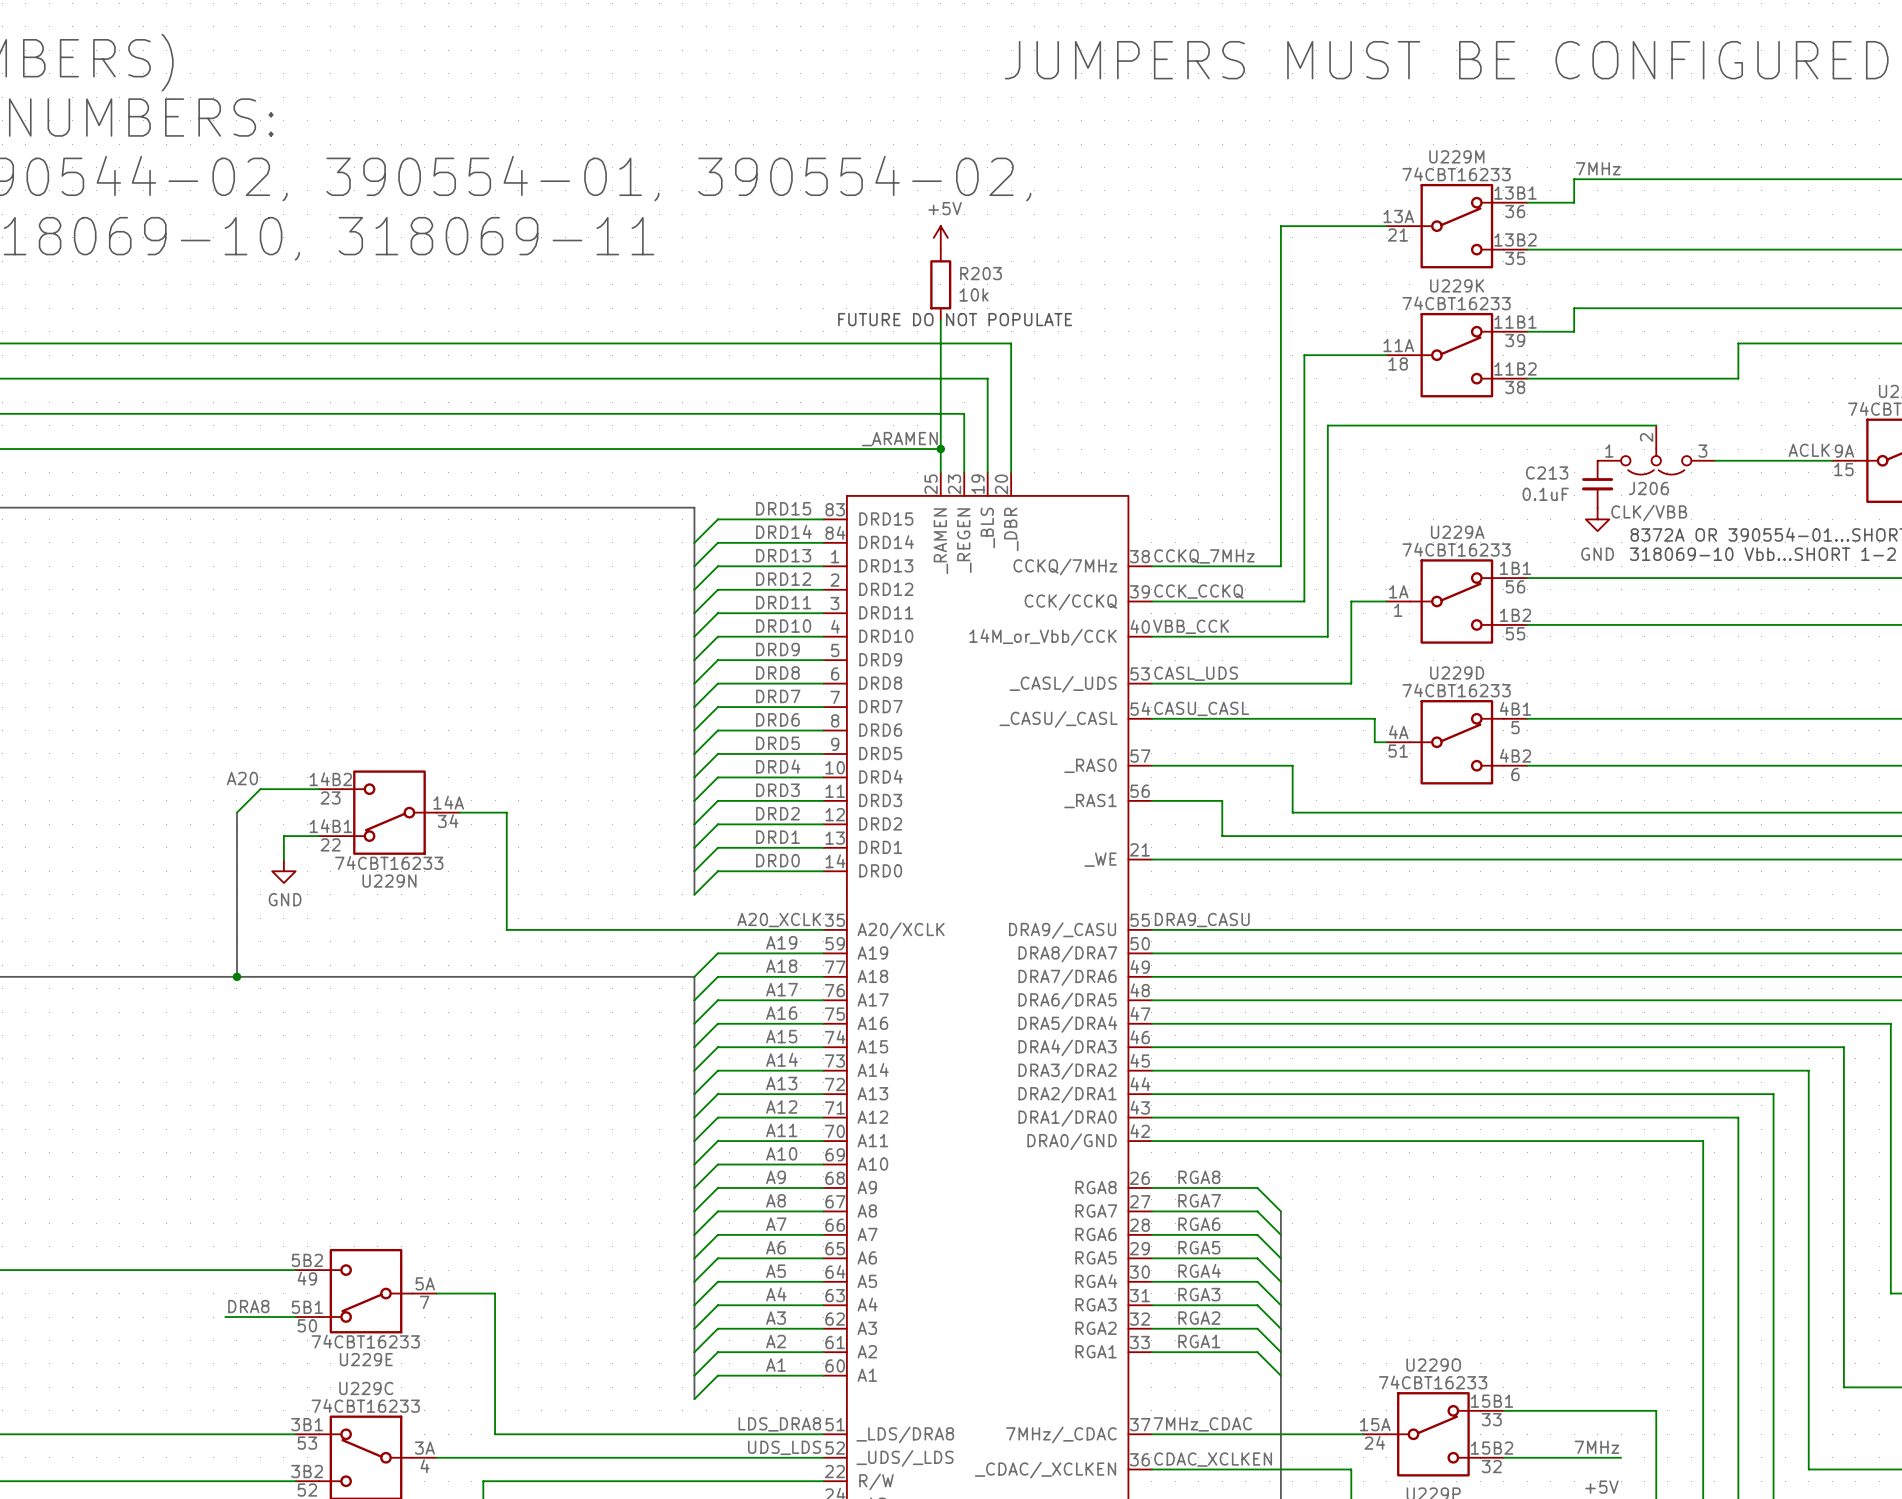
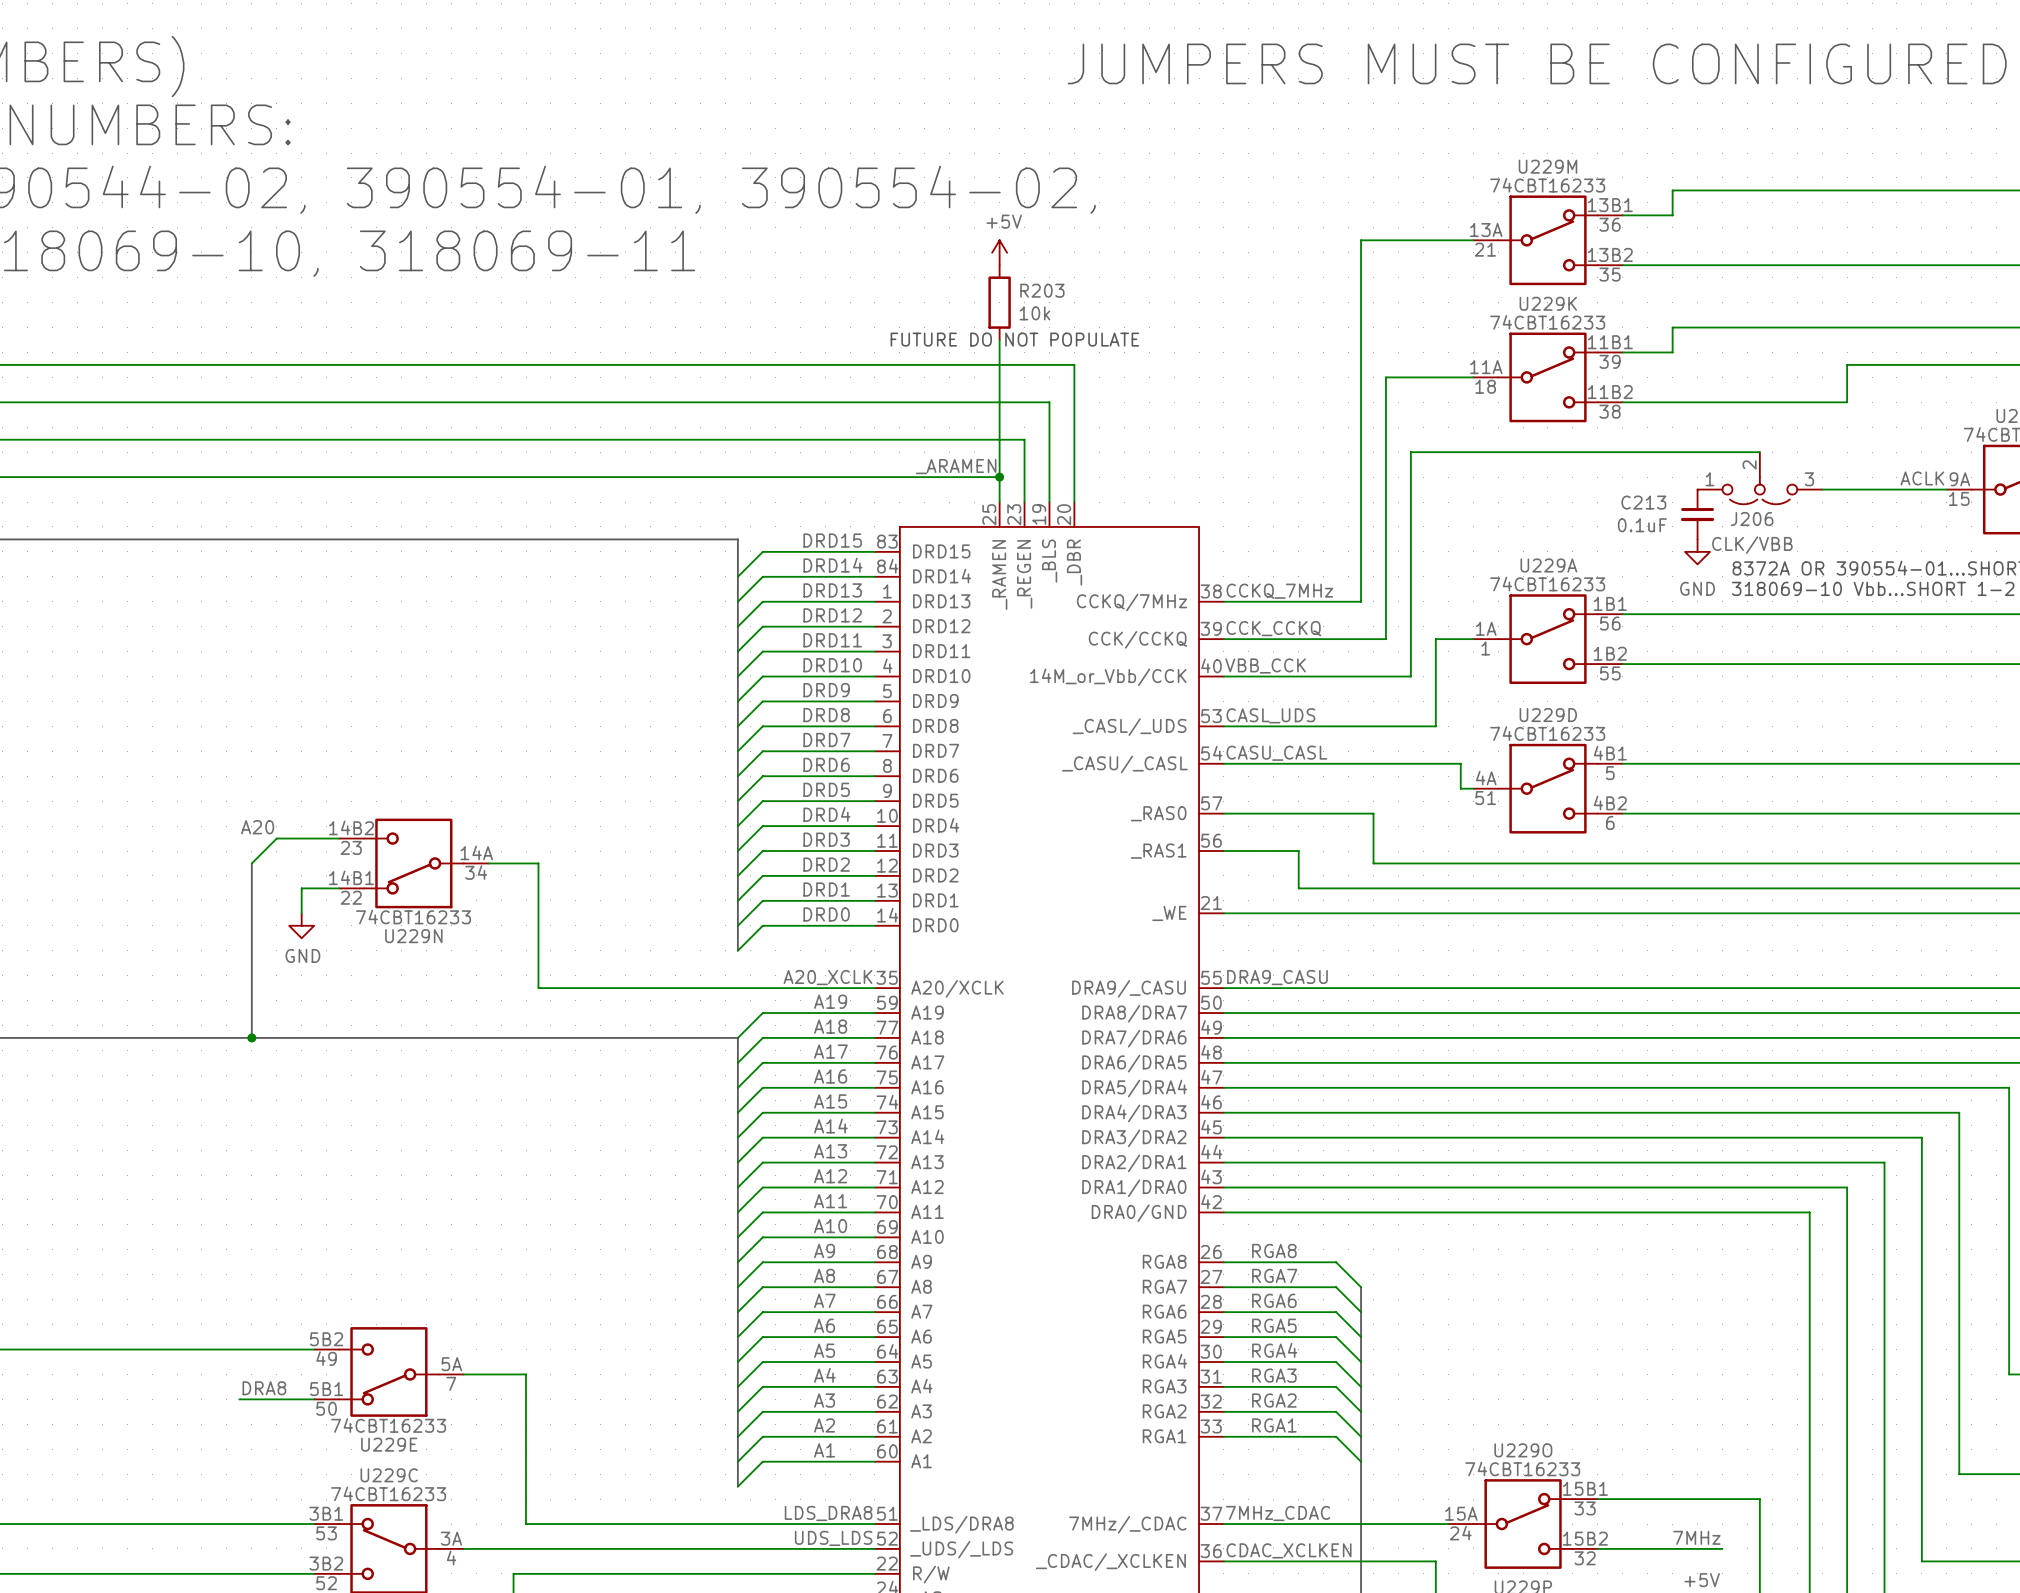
label: 7MHz (1598, 168) -> none

